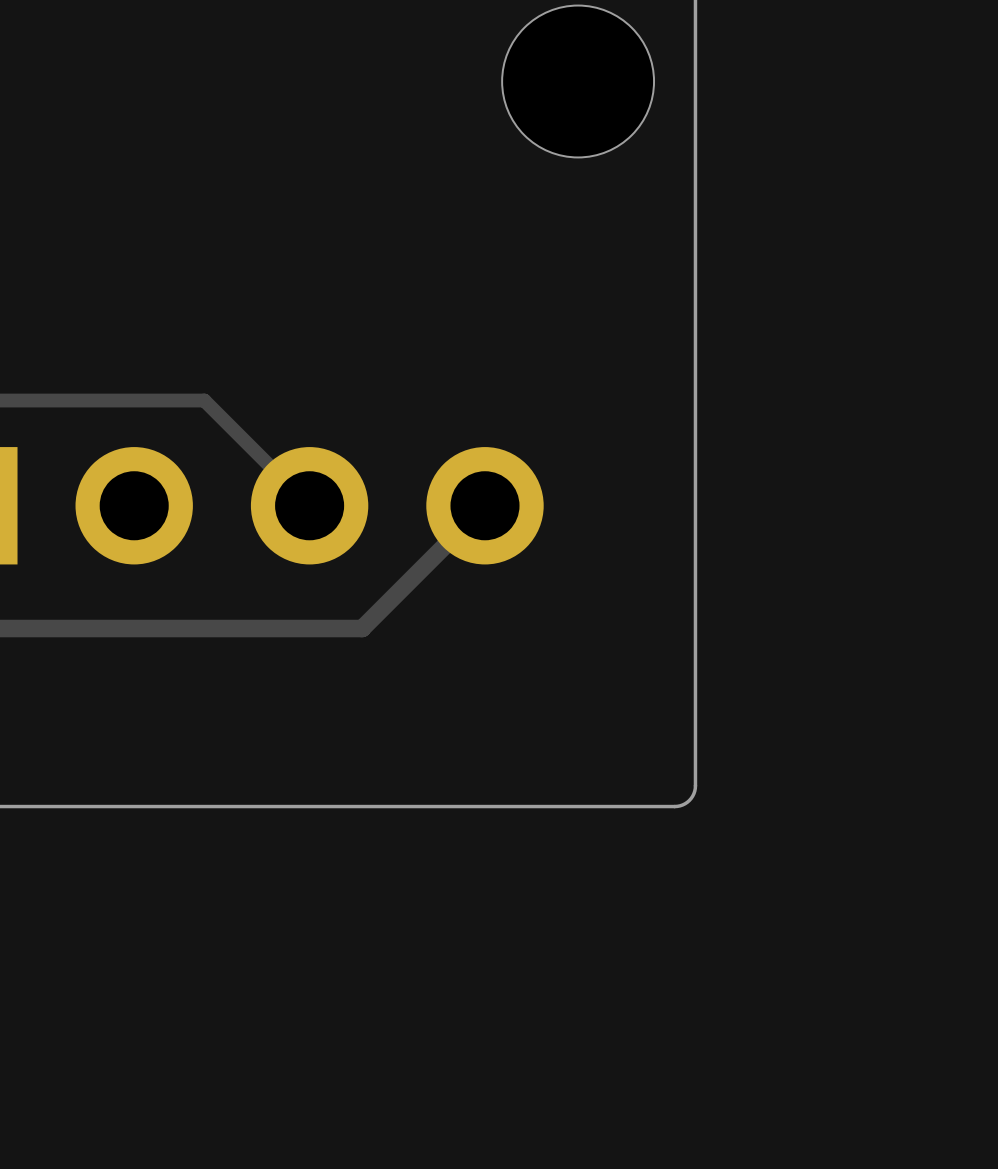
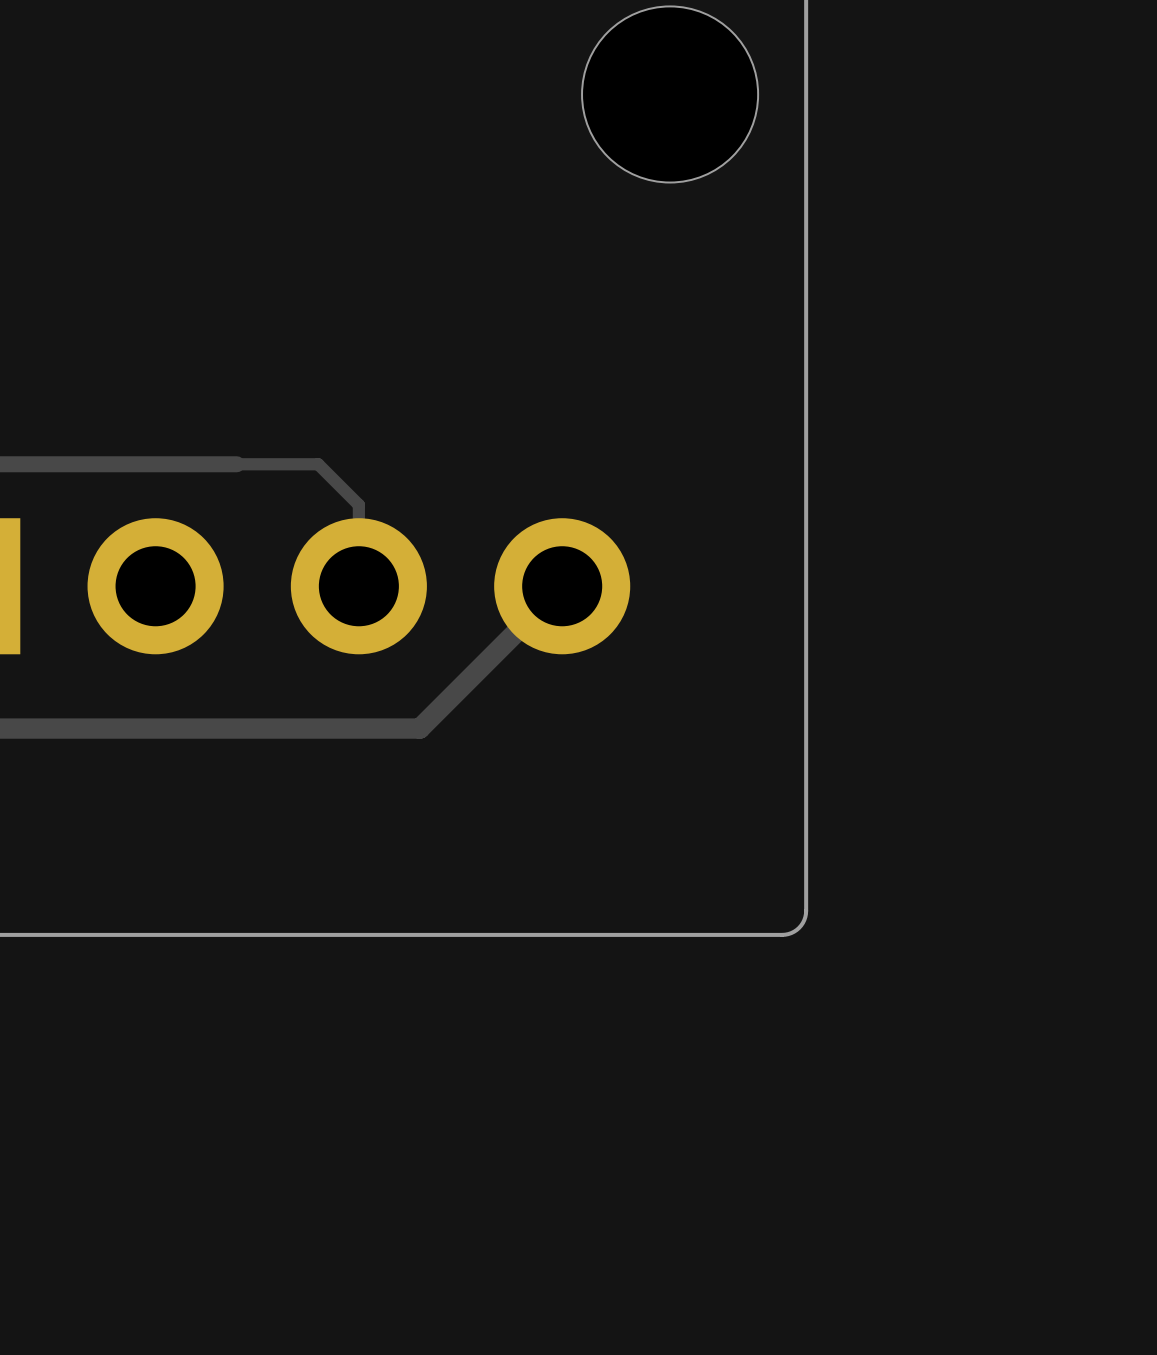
track: (204, 400) (309, 505) -> (236, 464) (318, 464) (358, 504) (358, 586)

